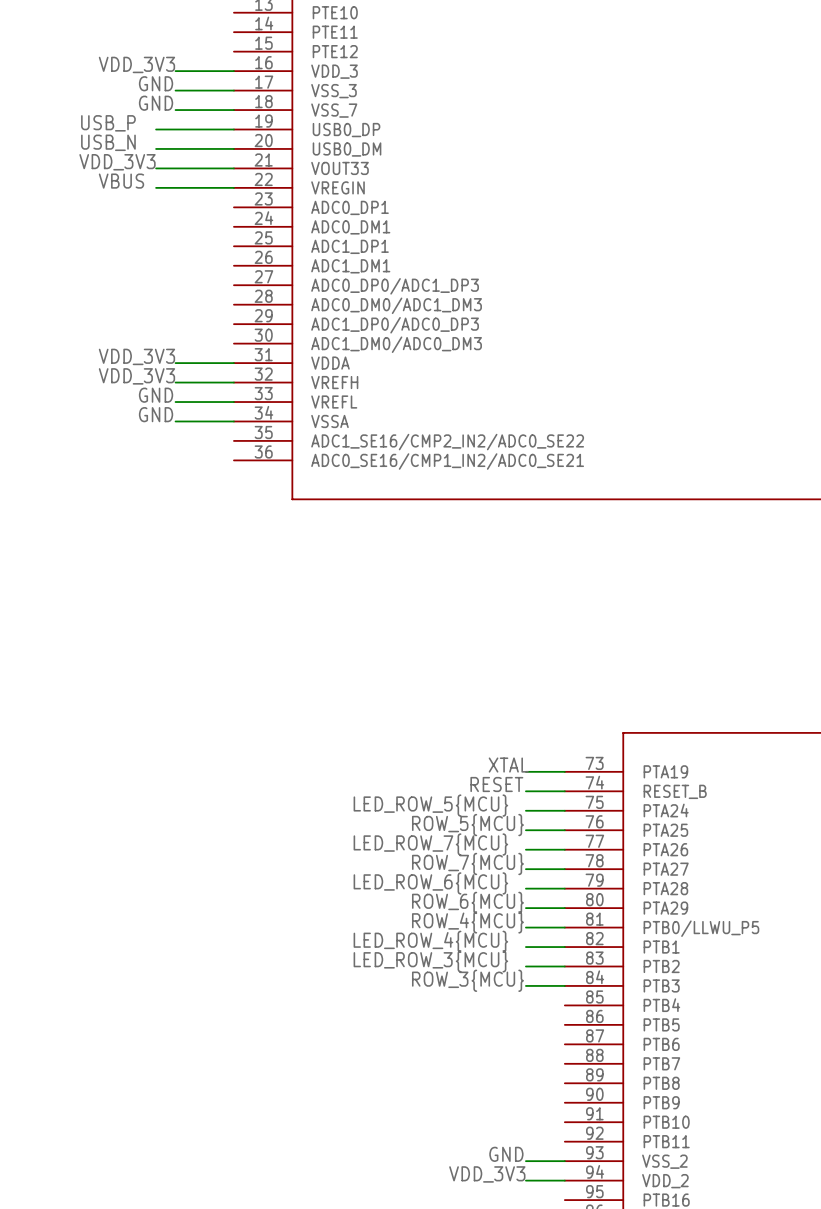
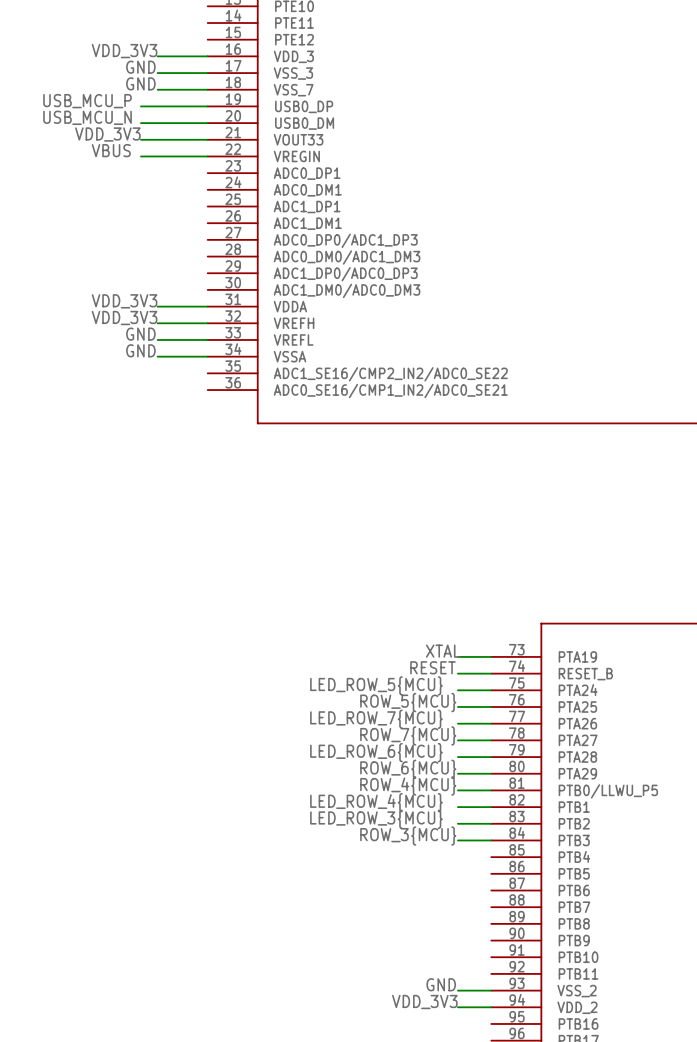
label: USB_P (108, 123) -> USB_MCU_P (87, 101)
label: USB_N (108, 142) -> USB_MCU_N (87, 117)

